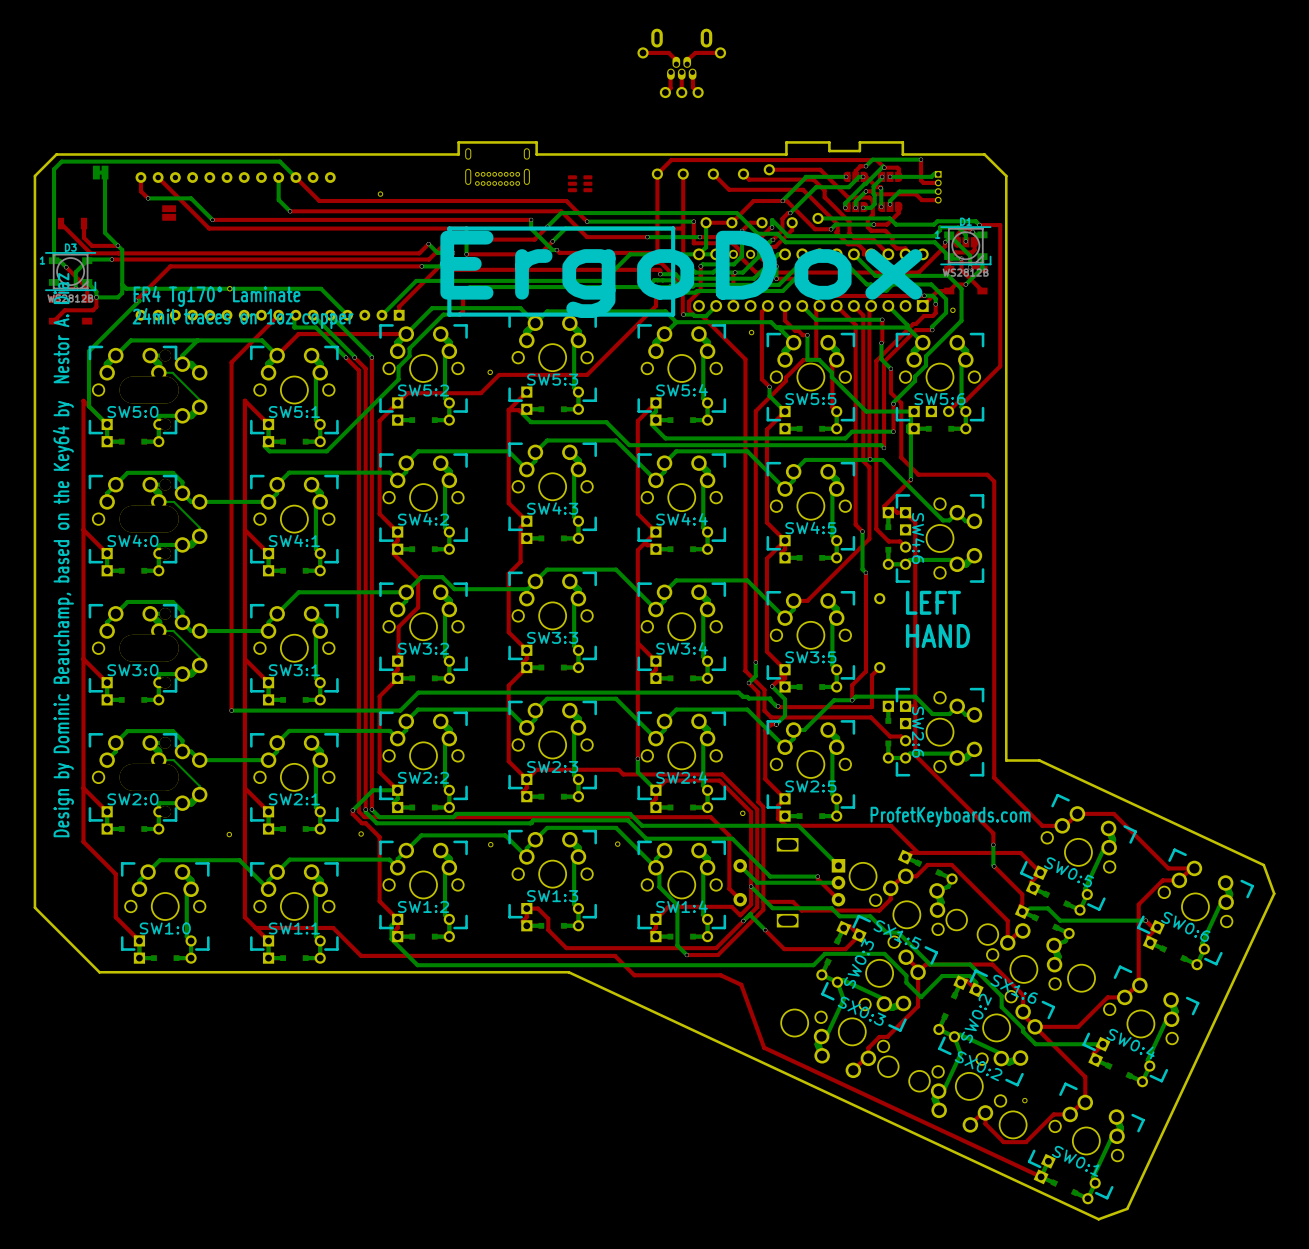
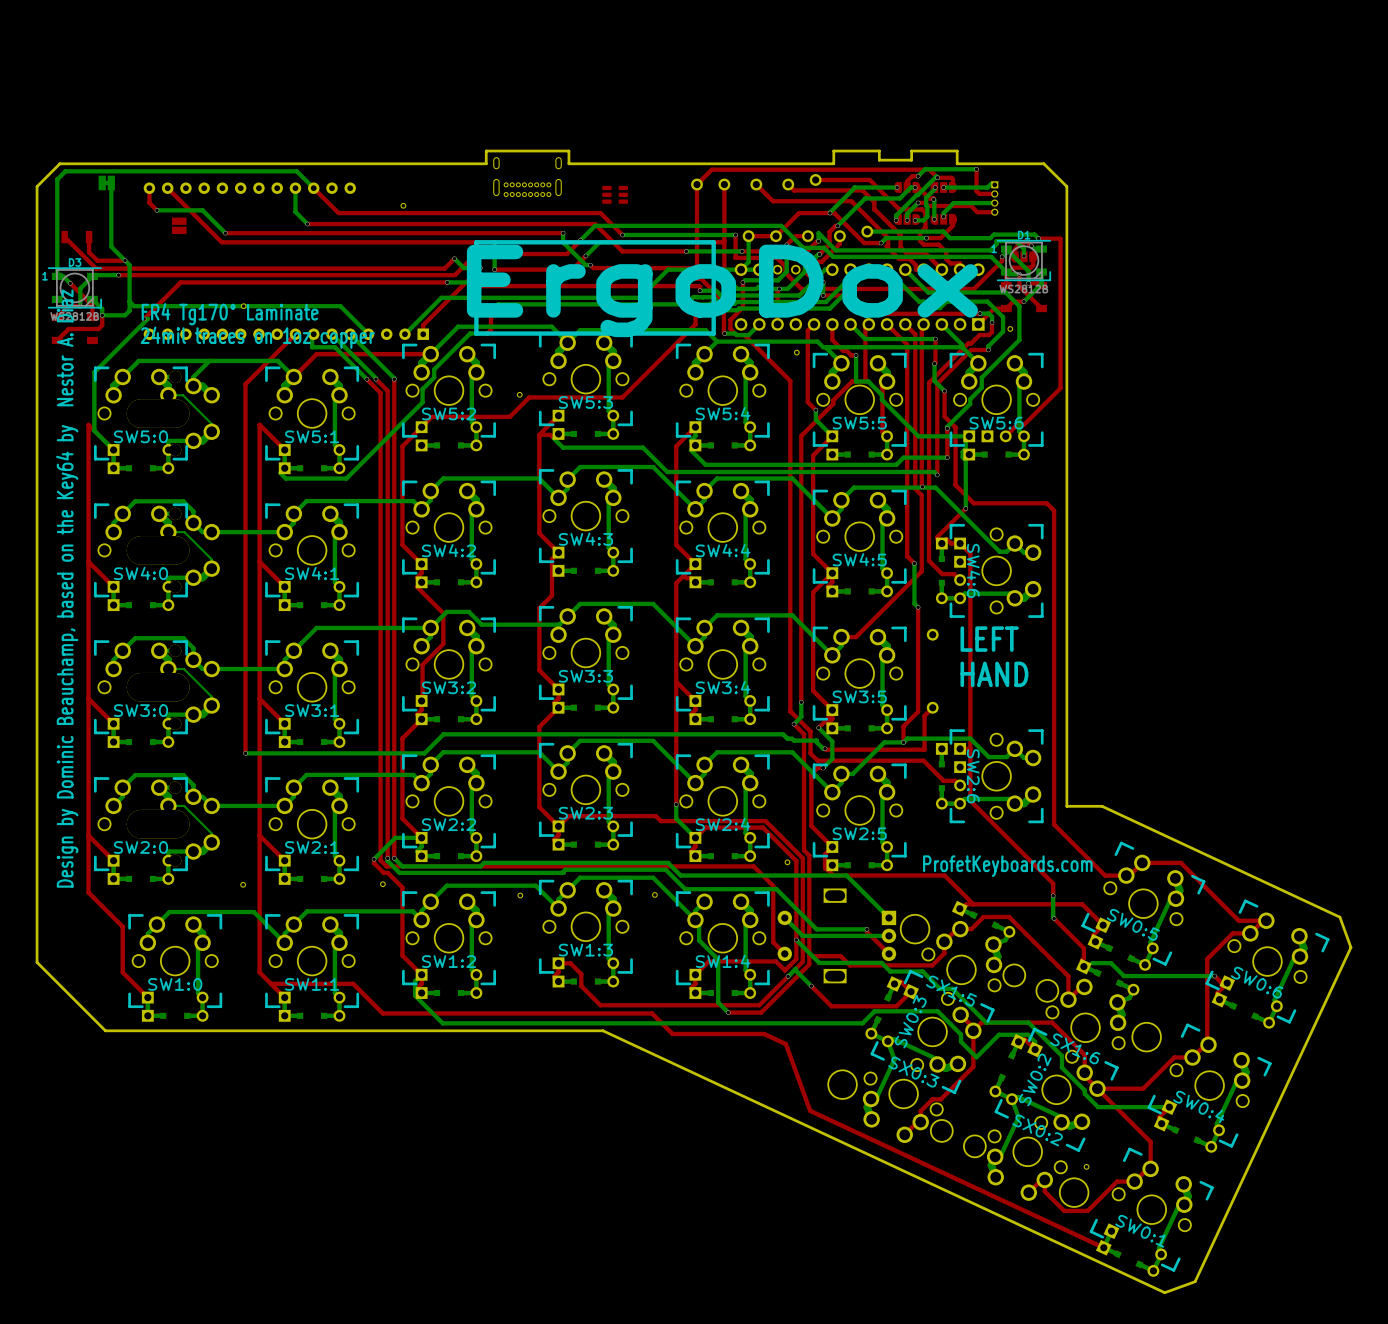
part: (681, 63) -> none

